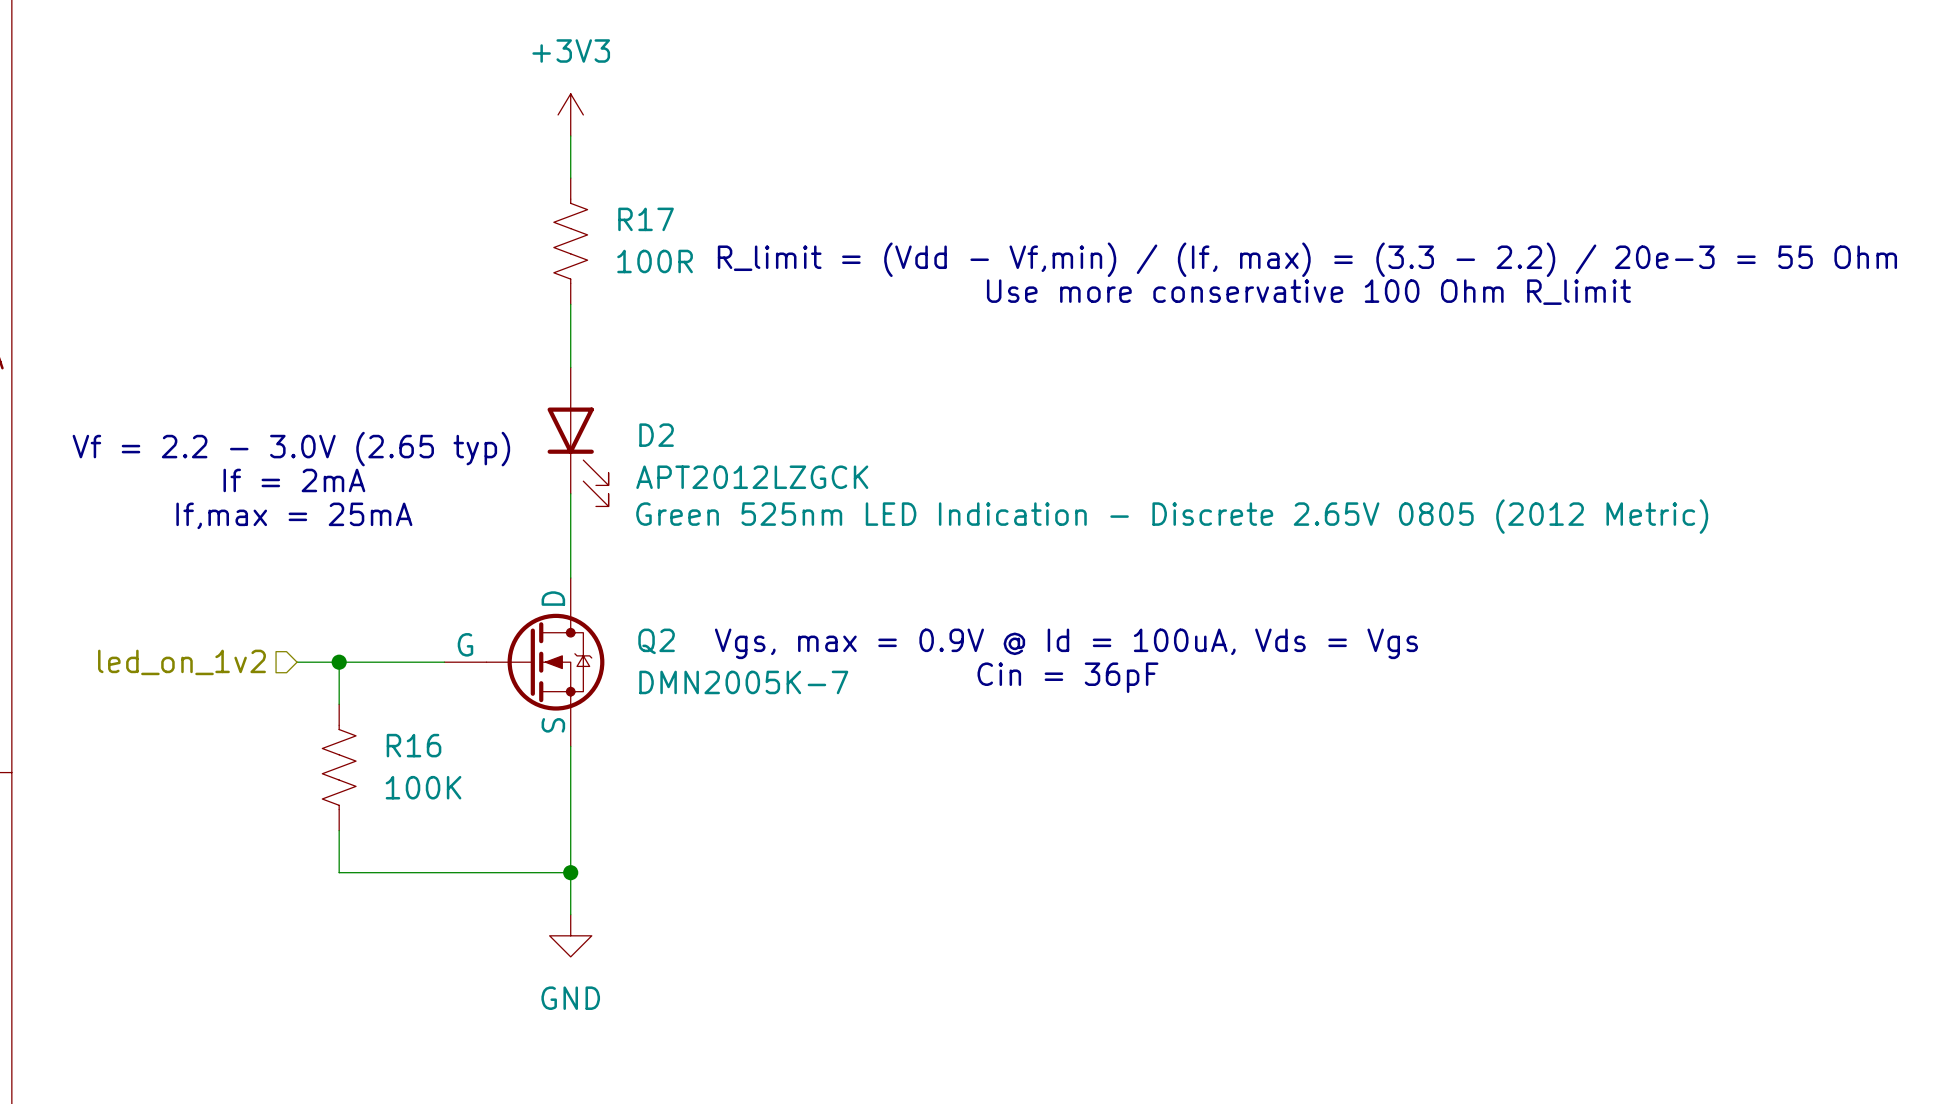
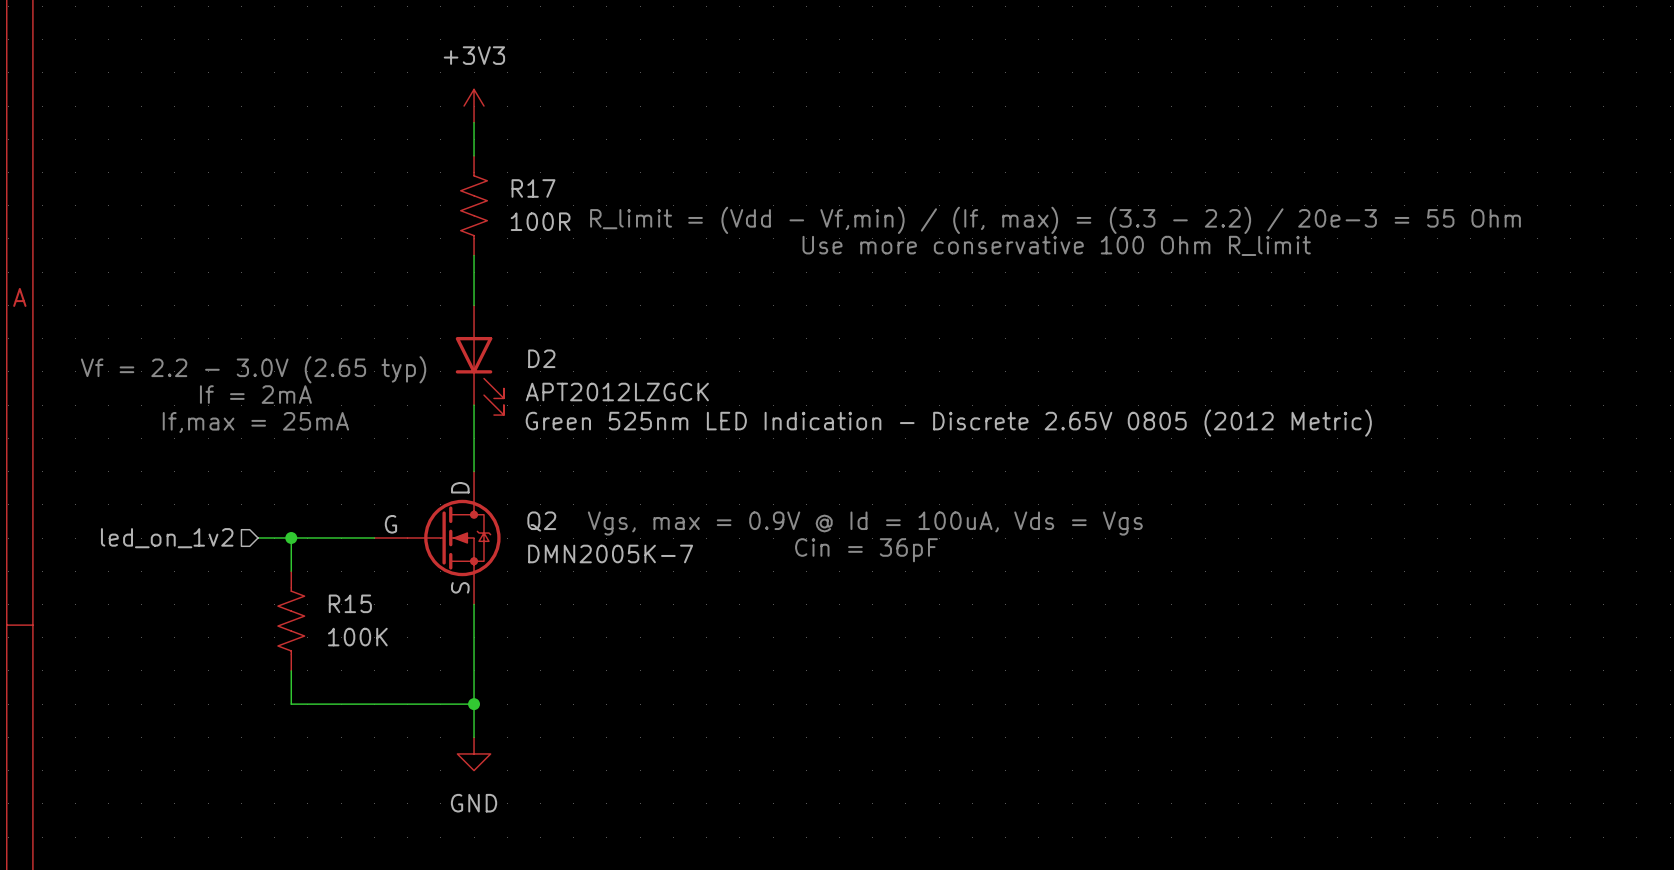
R16 name: R16 (414, 745) -> R15 (350, 603)

